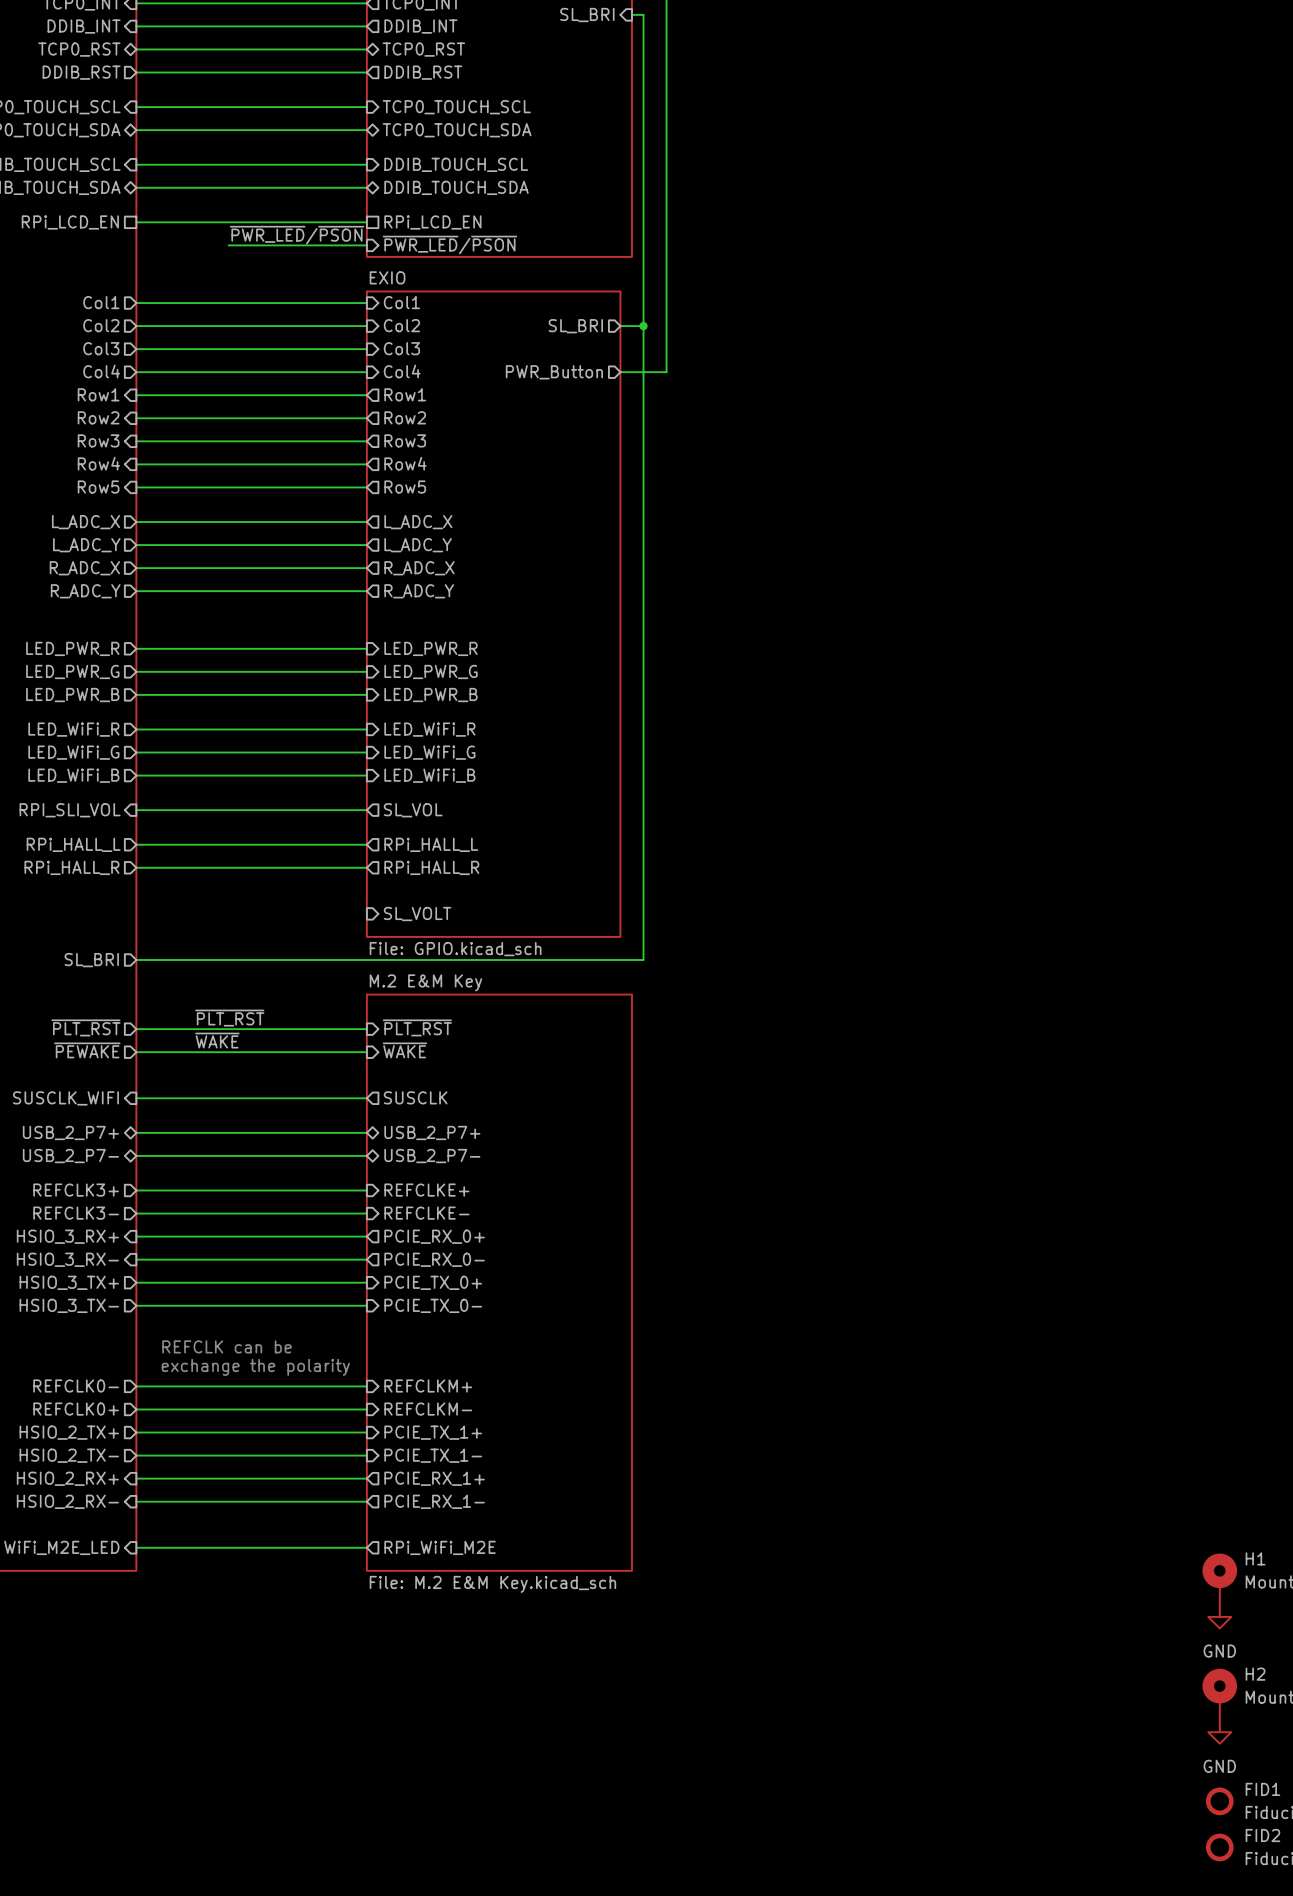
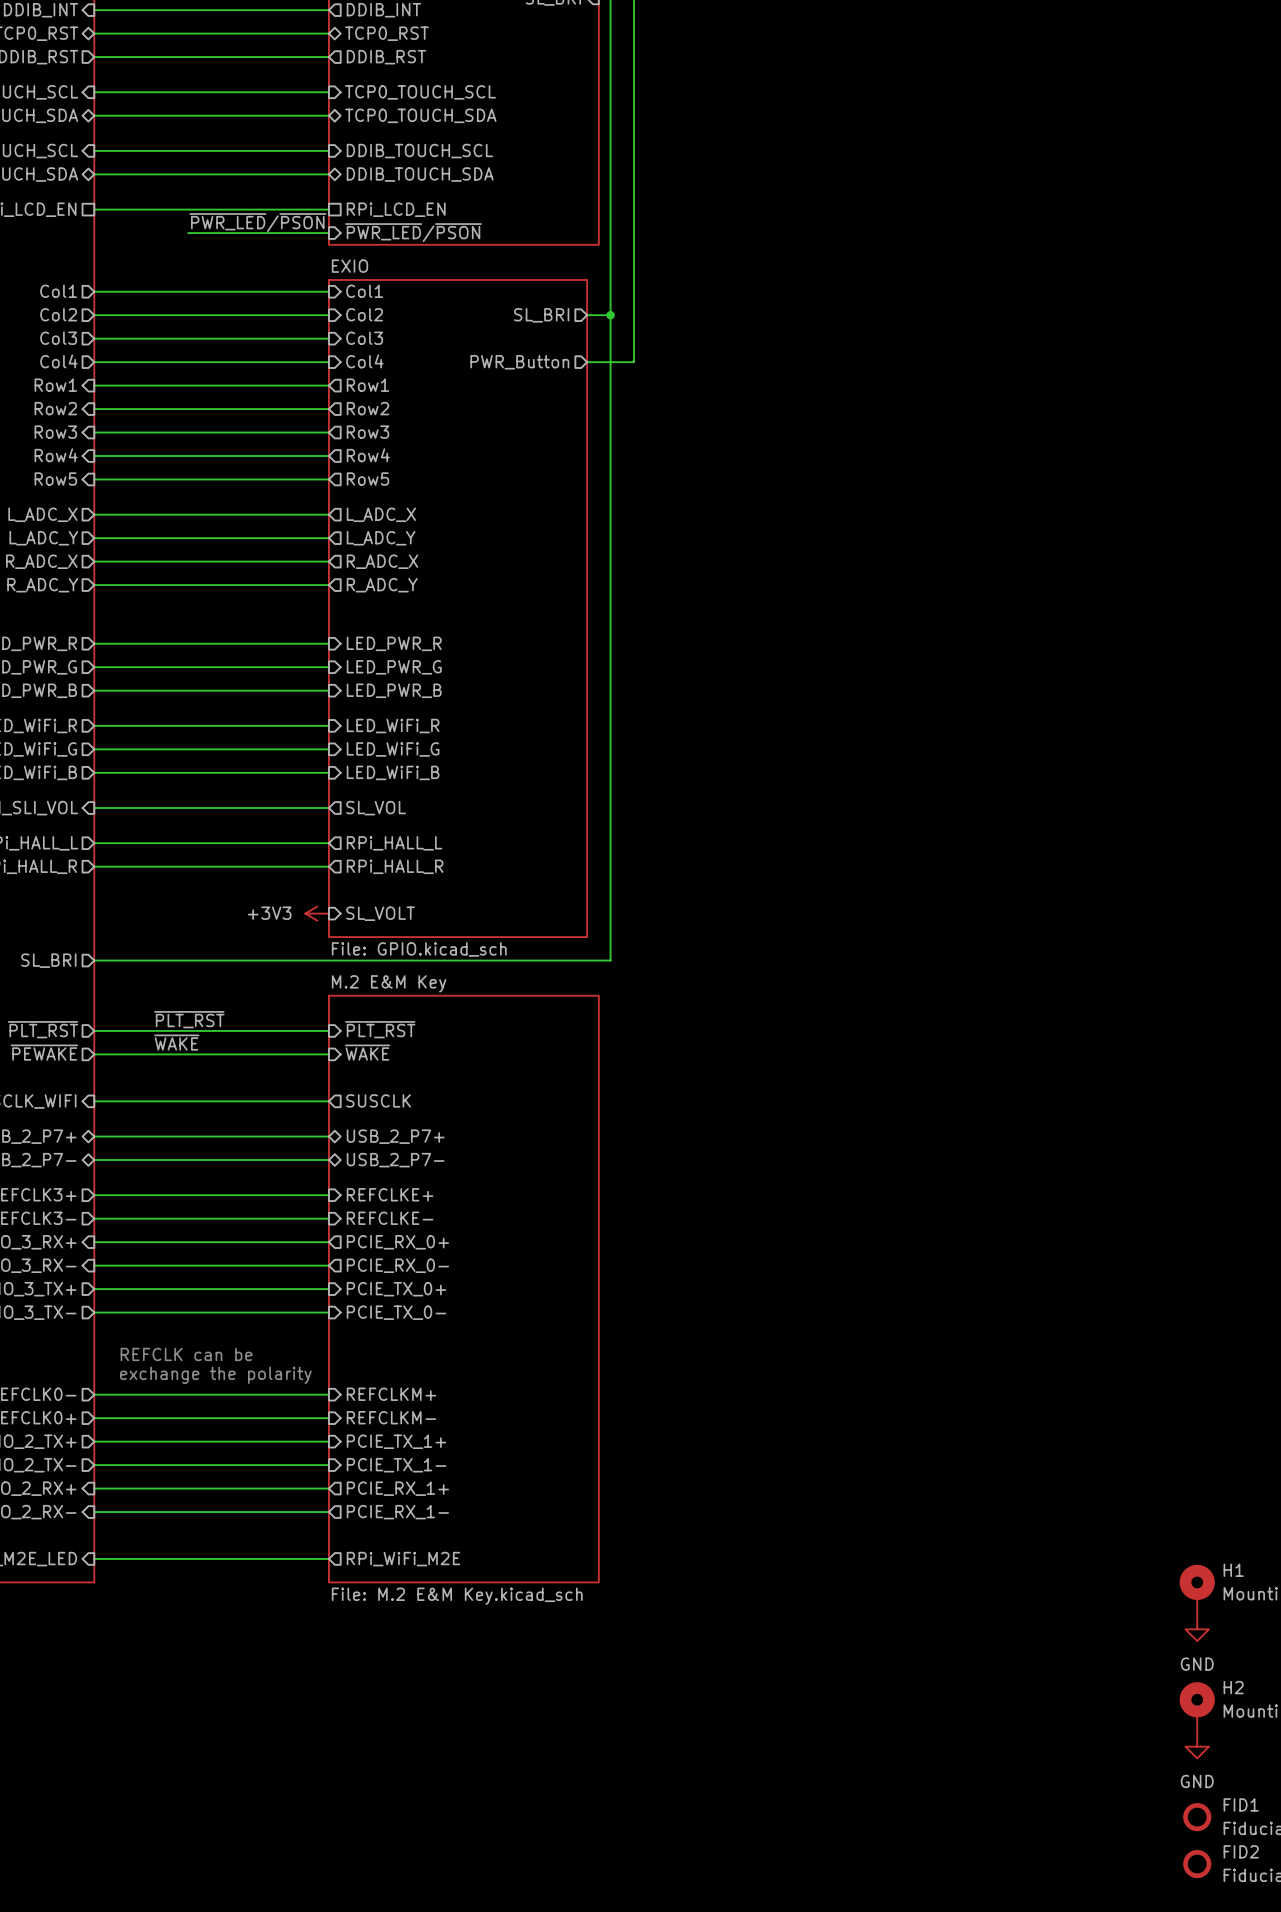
power symbol: none -> +3V3 (317, 913)

